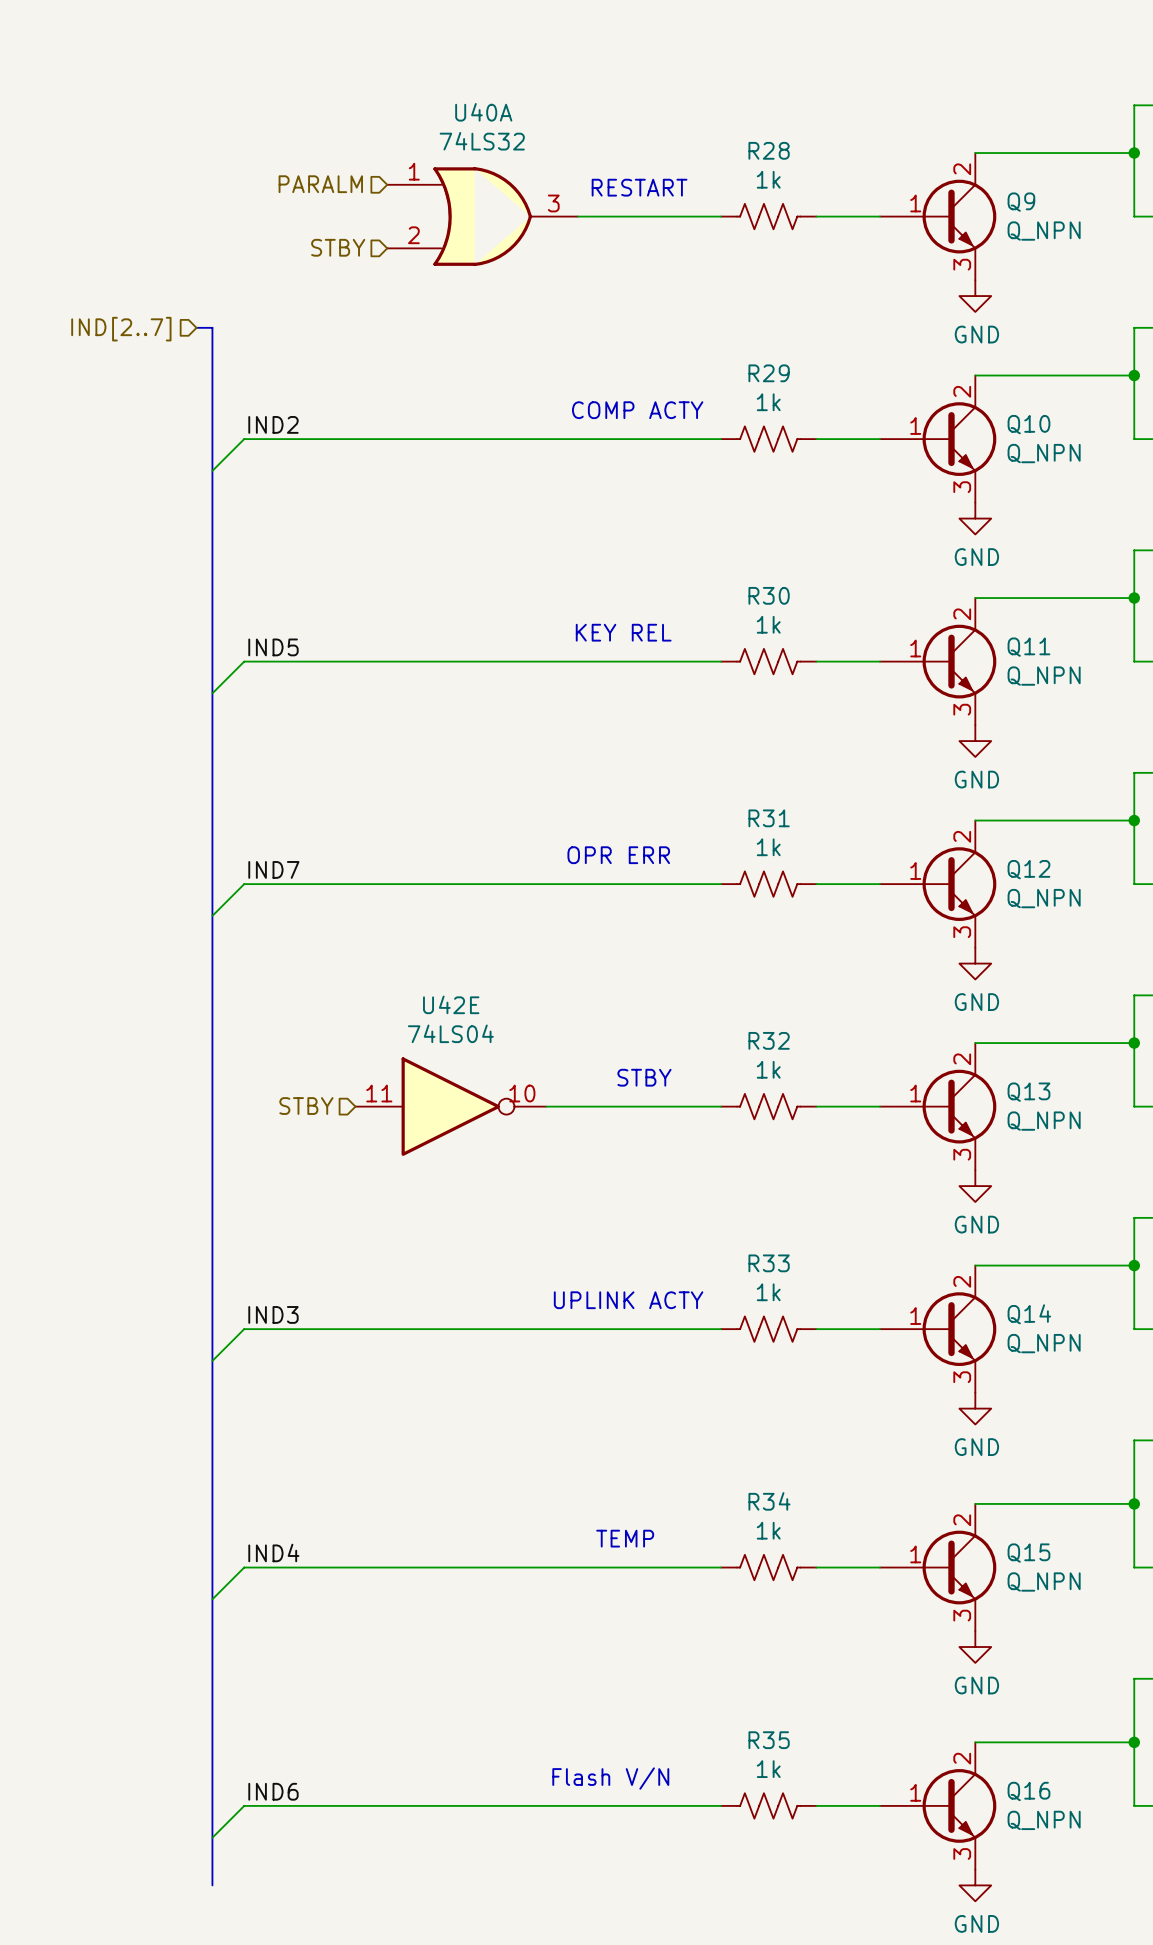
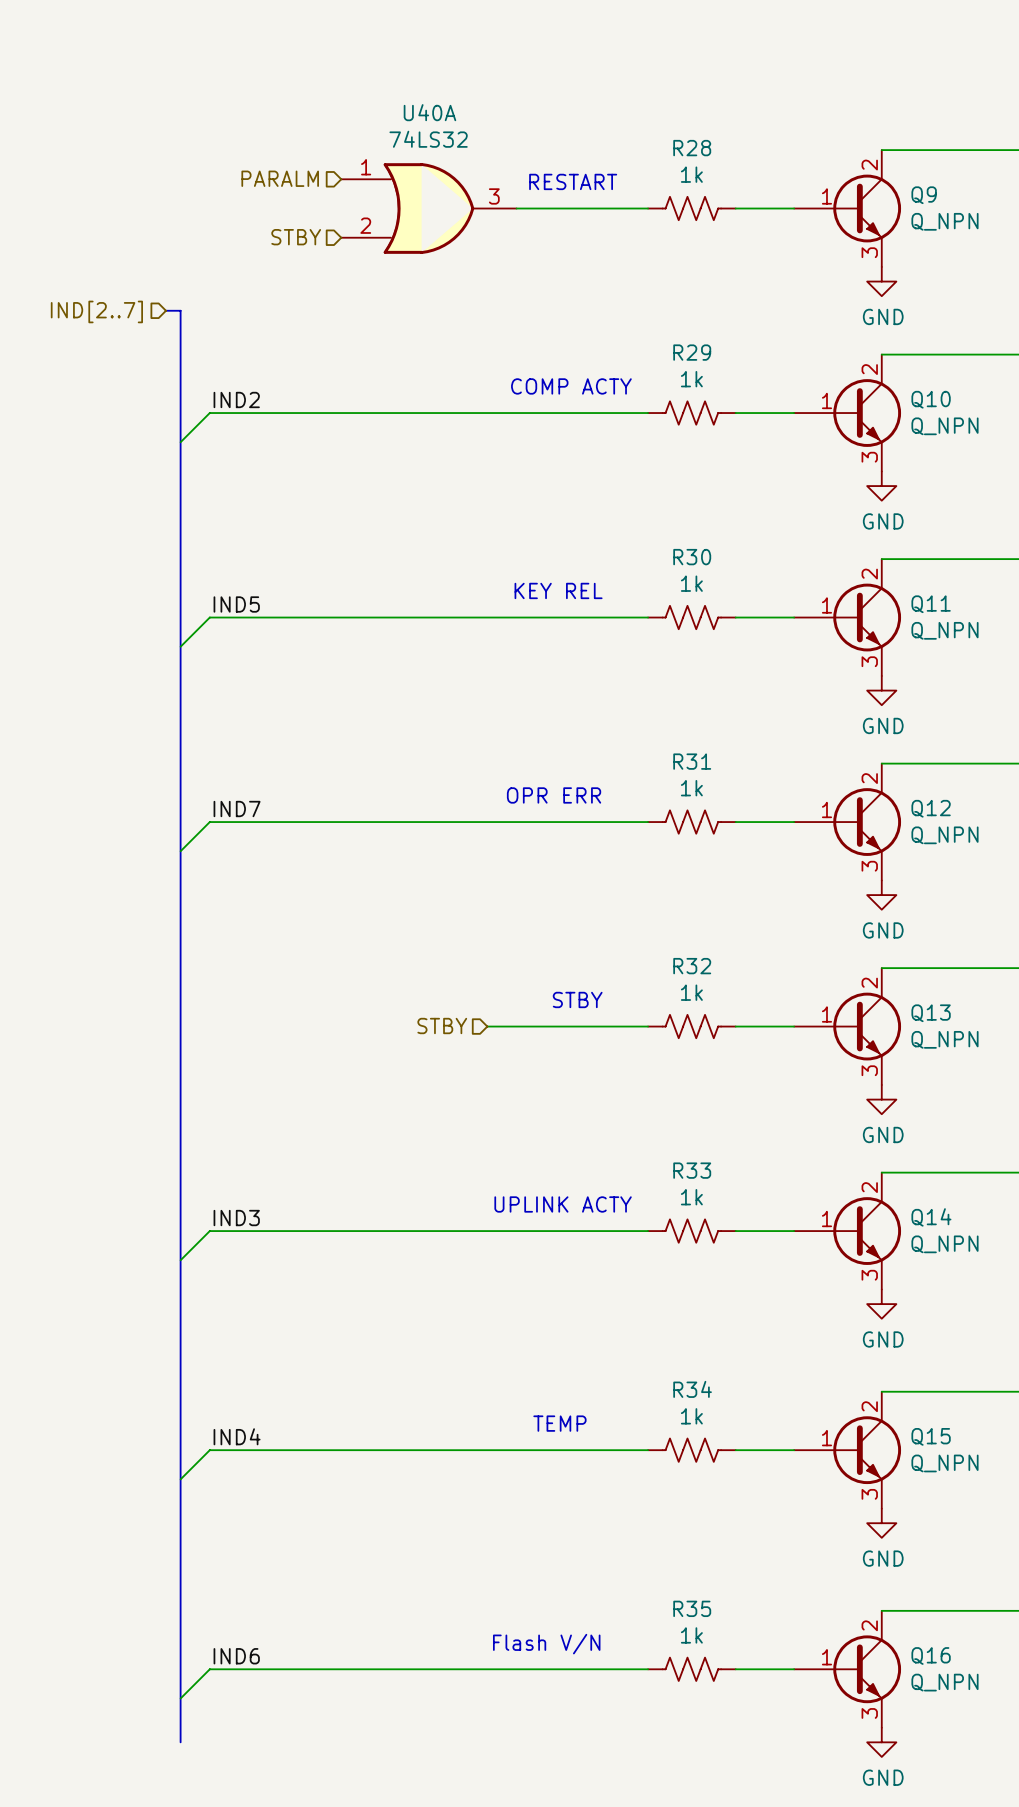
hierarchical label position: STBY (306, 1106) -> STBY (442, 1026)
U42E: 74LS04 (450, 1106) -> none

